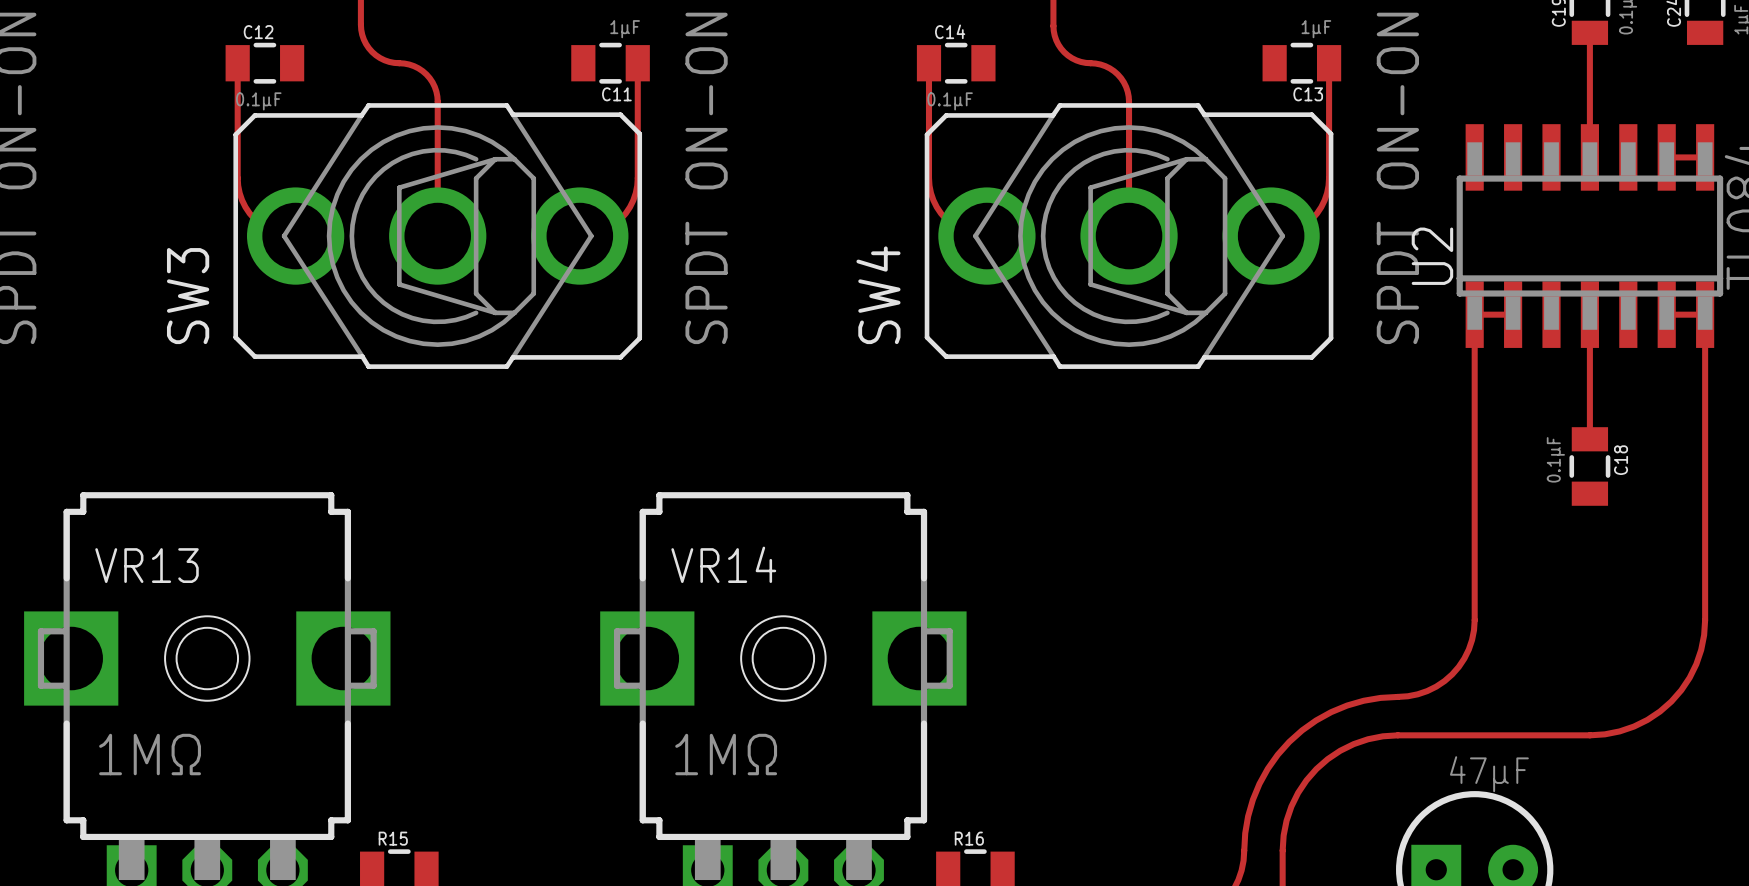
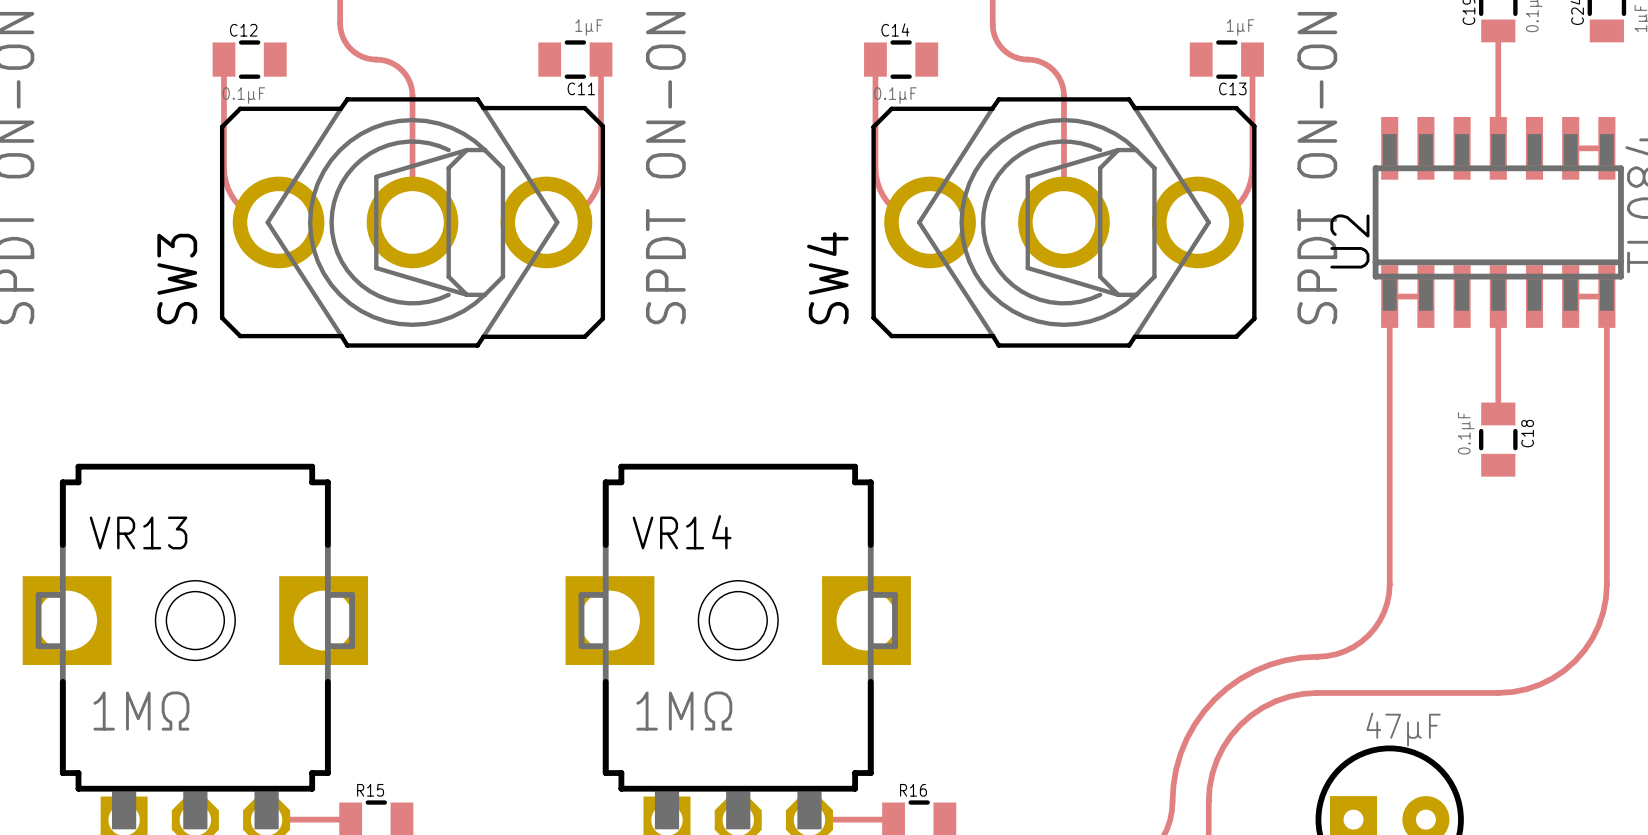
track: none -> (350, 819) (266, 820)
track: none -> (893, 819) (809, 820)

